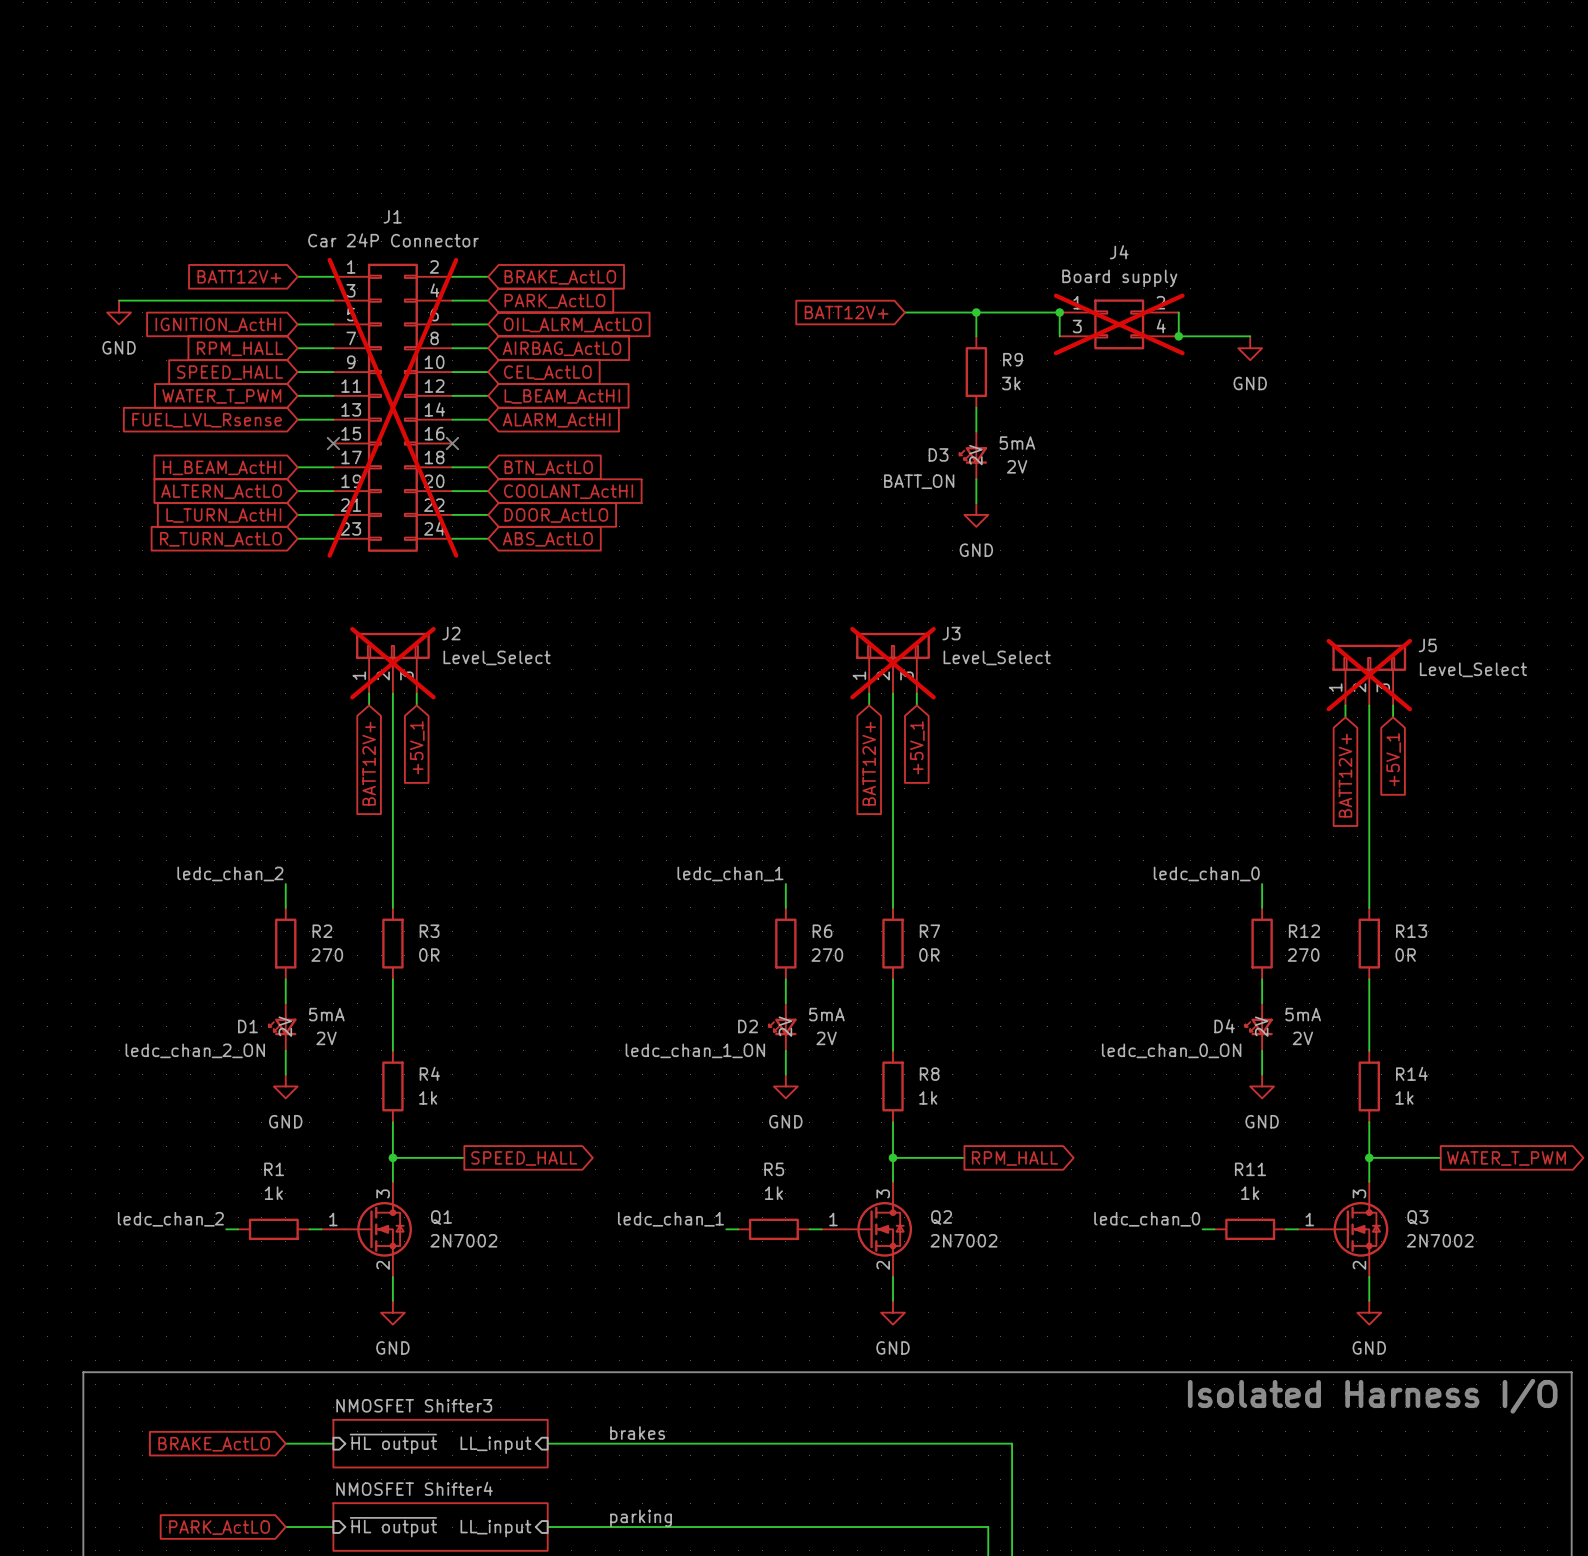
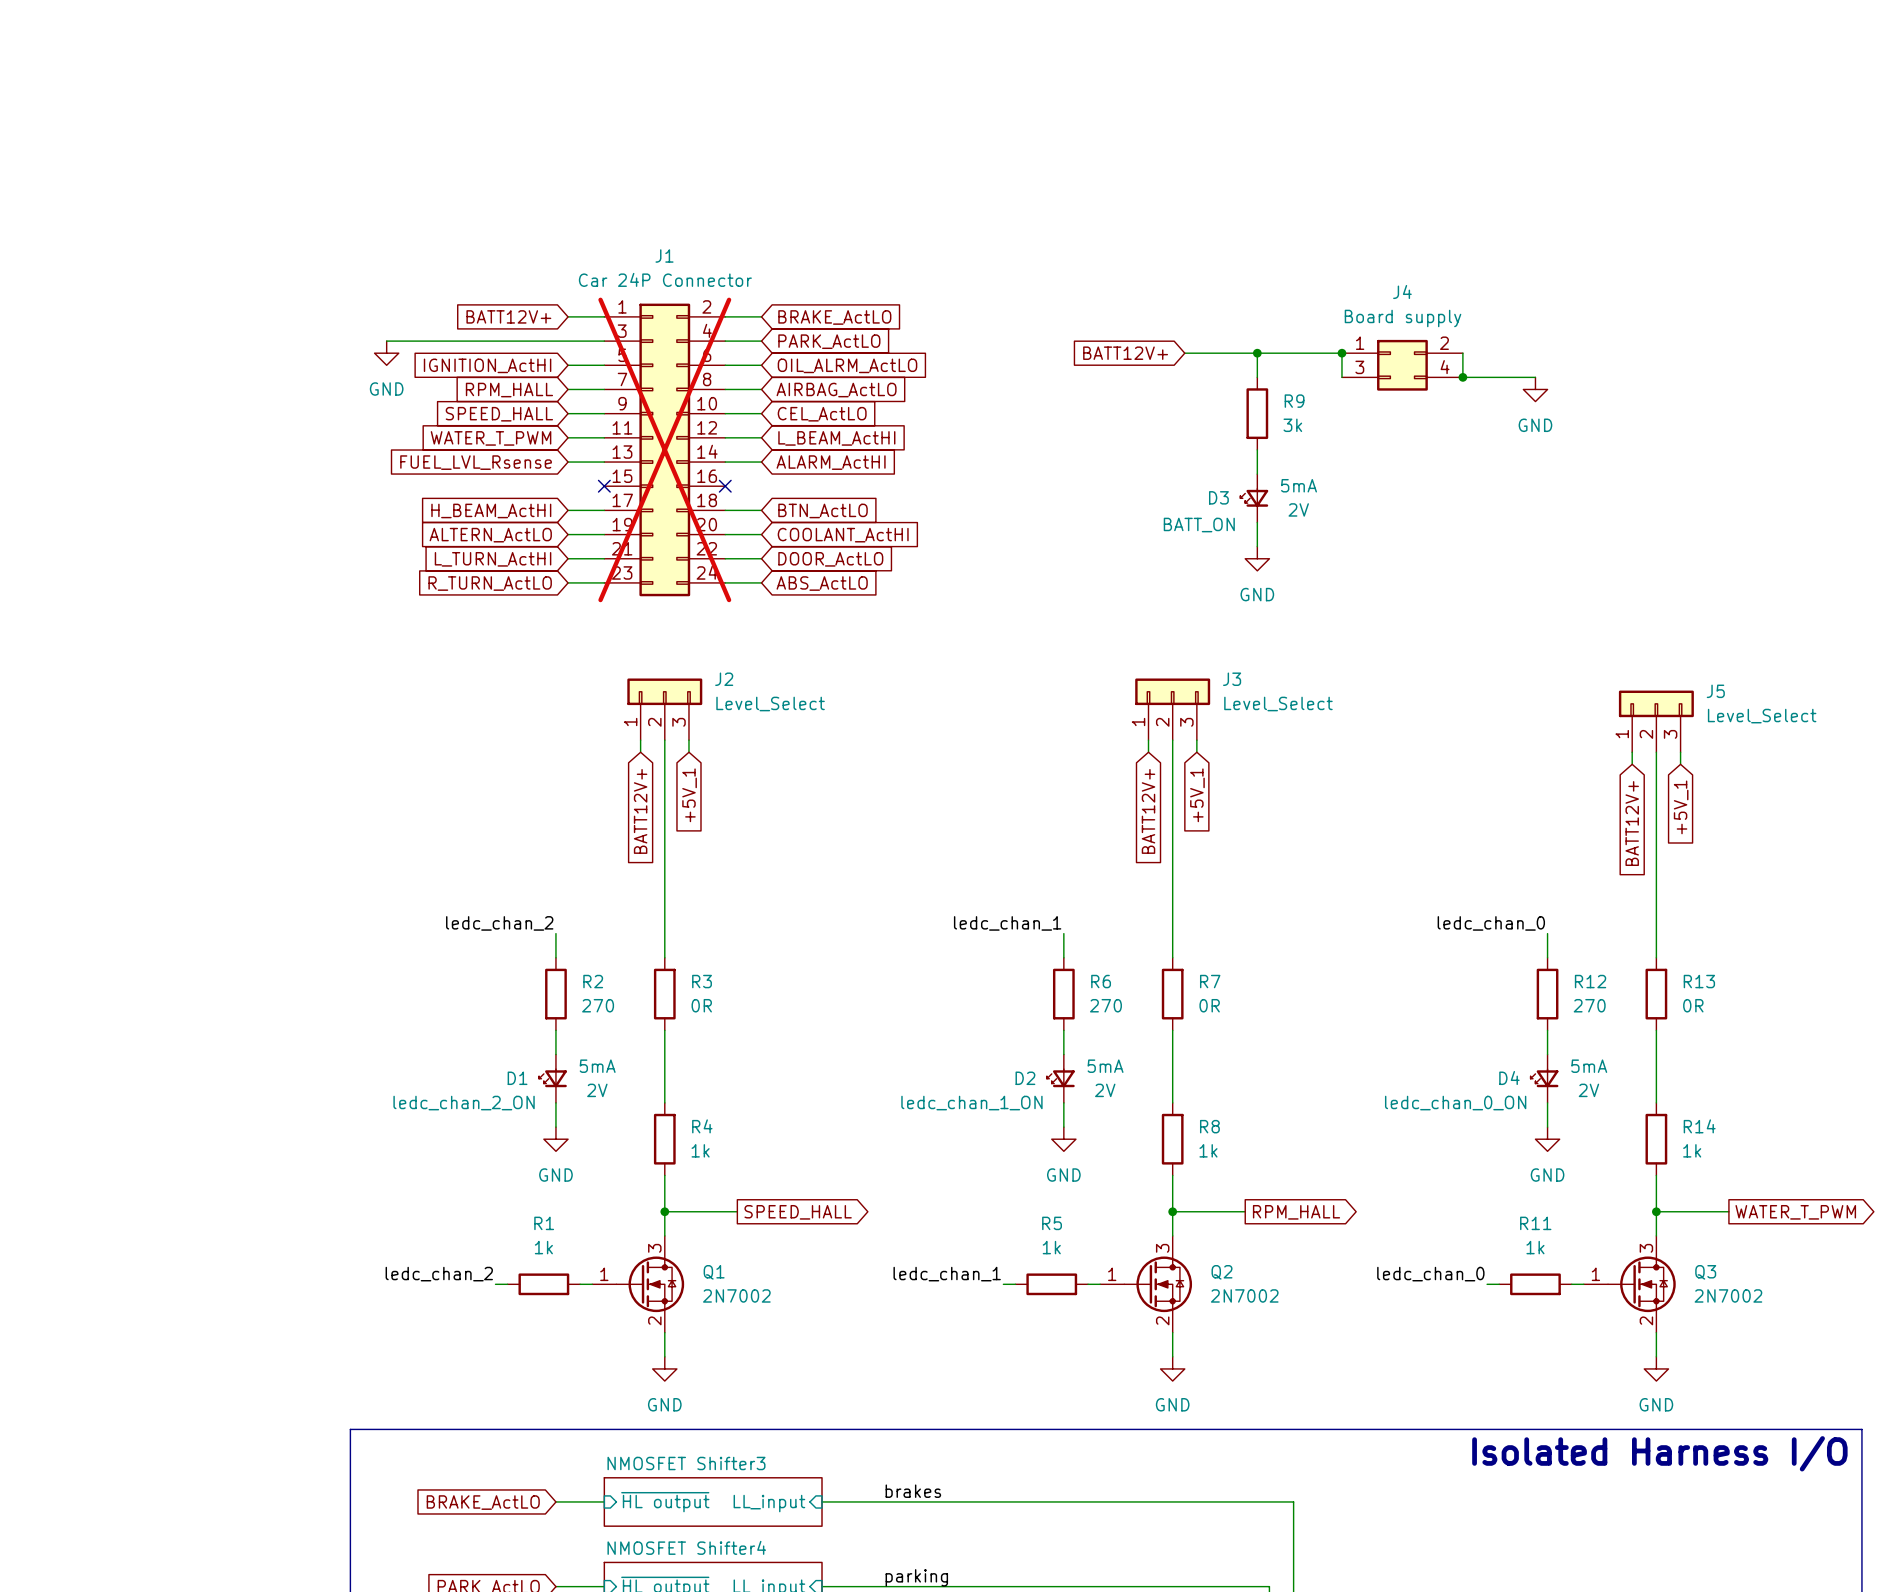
J4 do-not-place cross: (1119, 324) -> none
D3 text: 2V (975, 455) -> none
J2 do-not-place cross: (392, 663) -> none
J3 do-not-place cross: (893, 663) -> none
J5 do-not-place cross: (1369, 675) -> none
D1 text: 2V (285, 1026) -> none
D2 text: 2V (785, 1026) -> none
D4 text: 2V (1261, 1026) -> none

